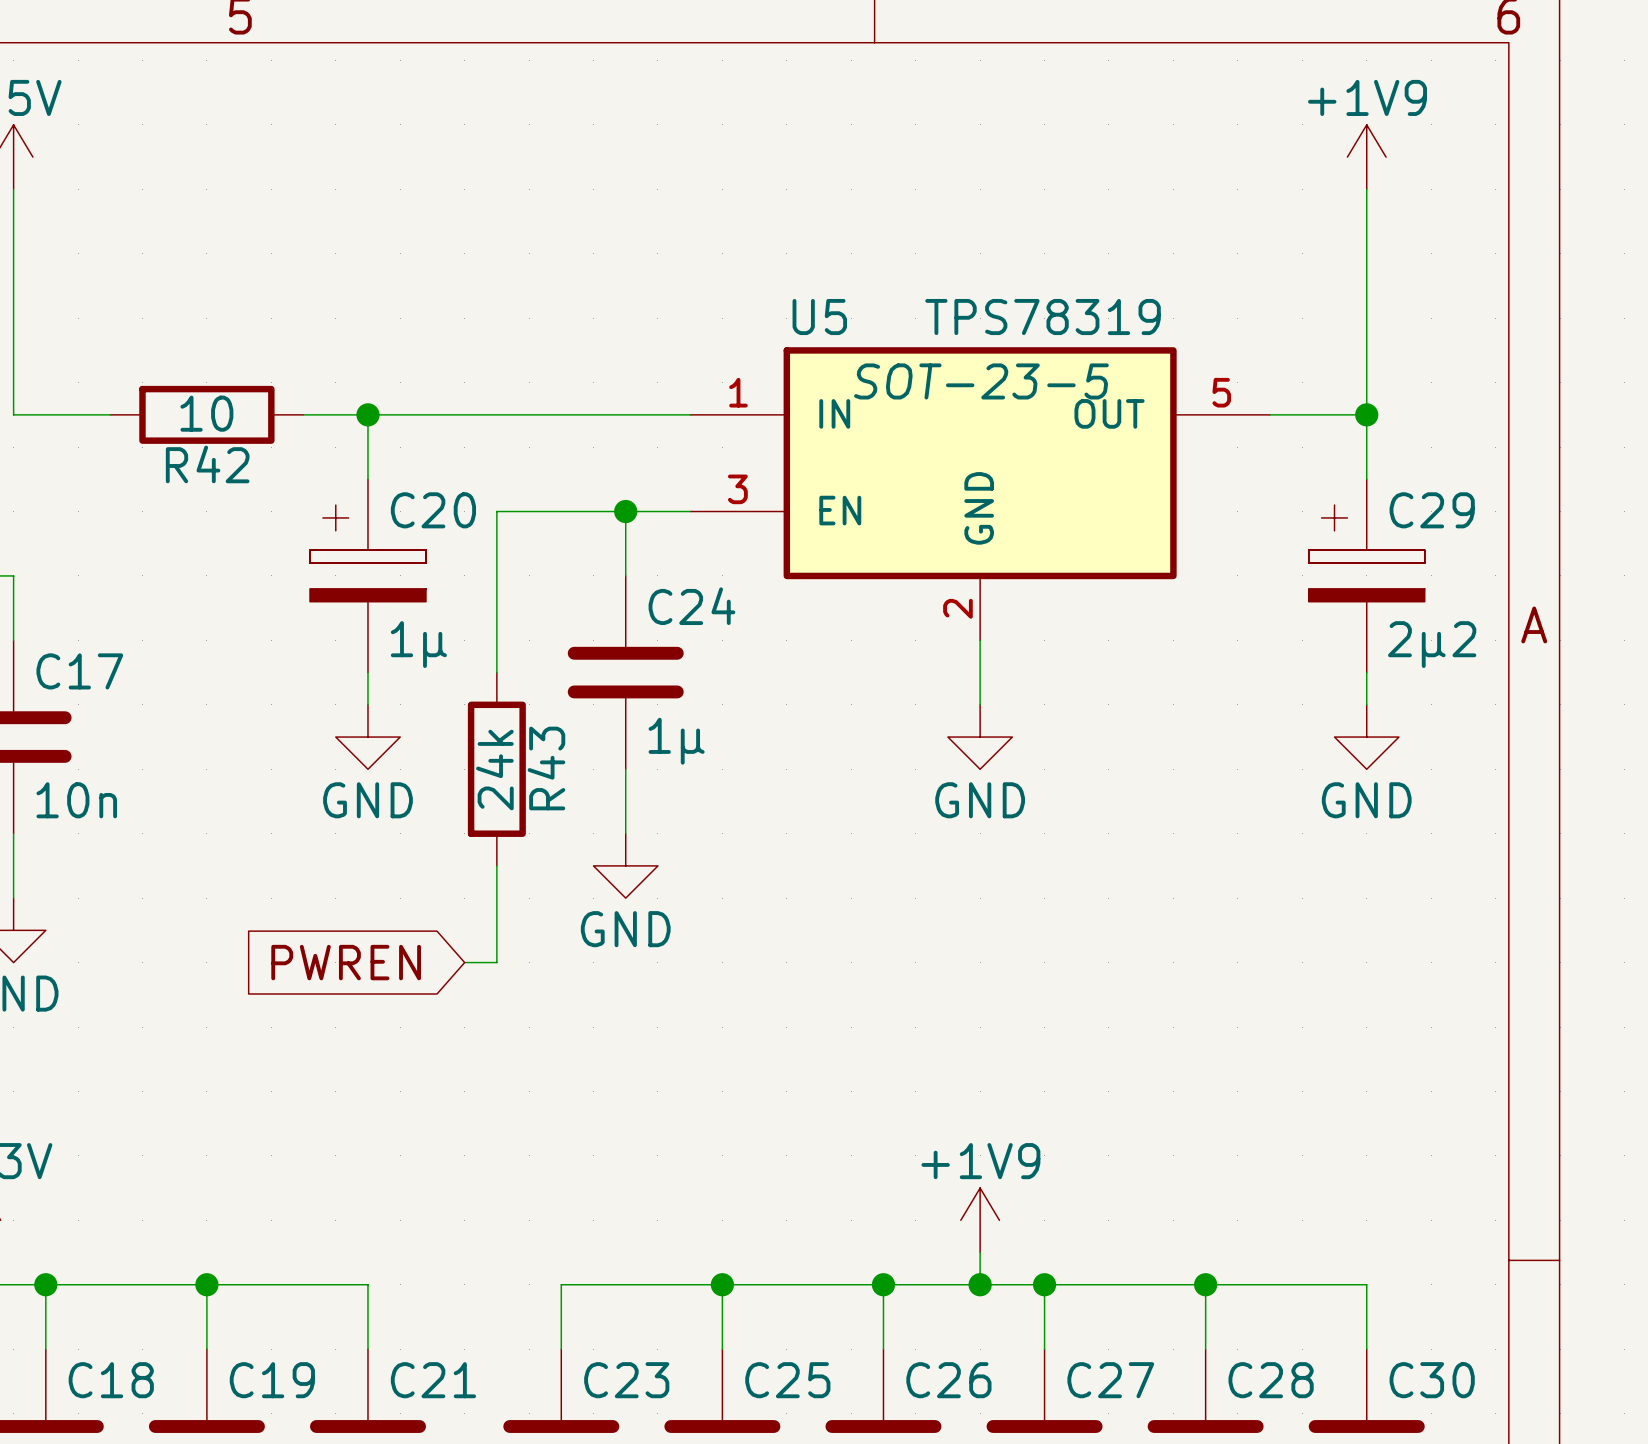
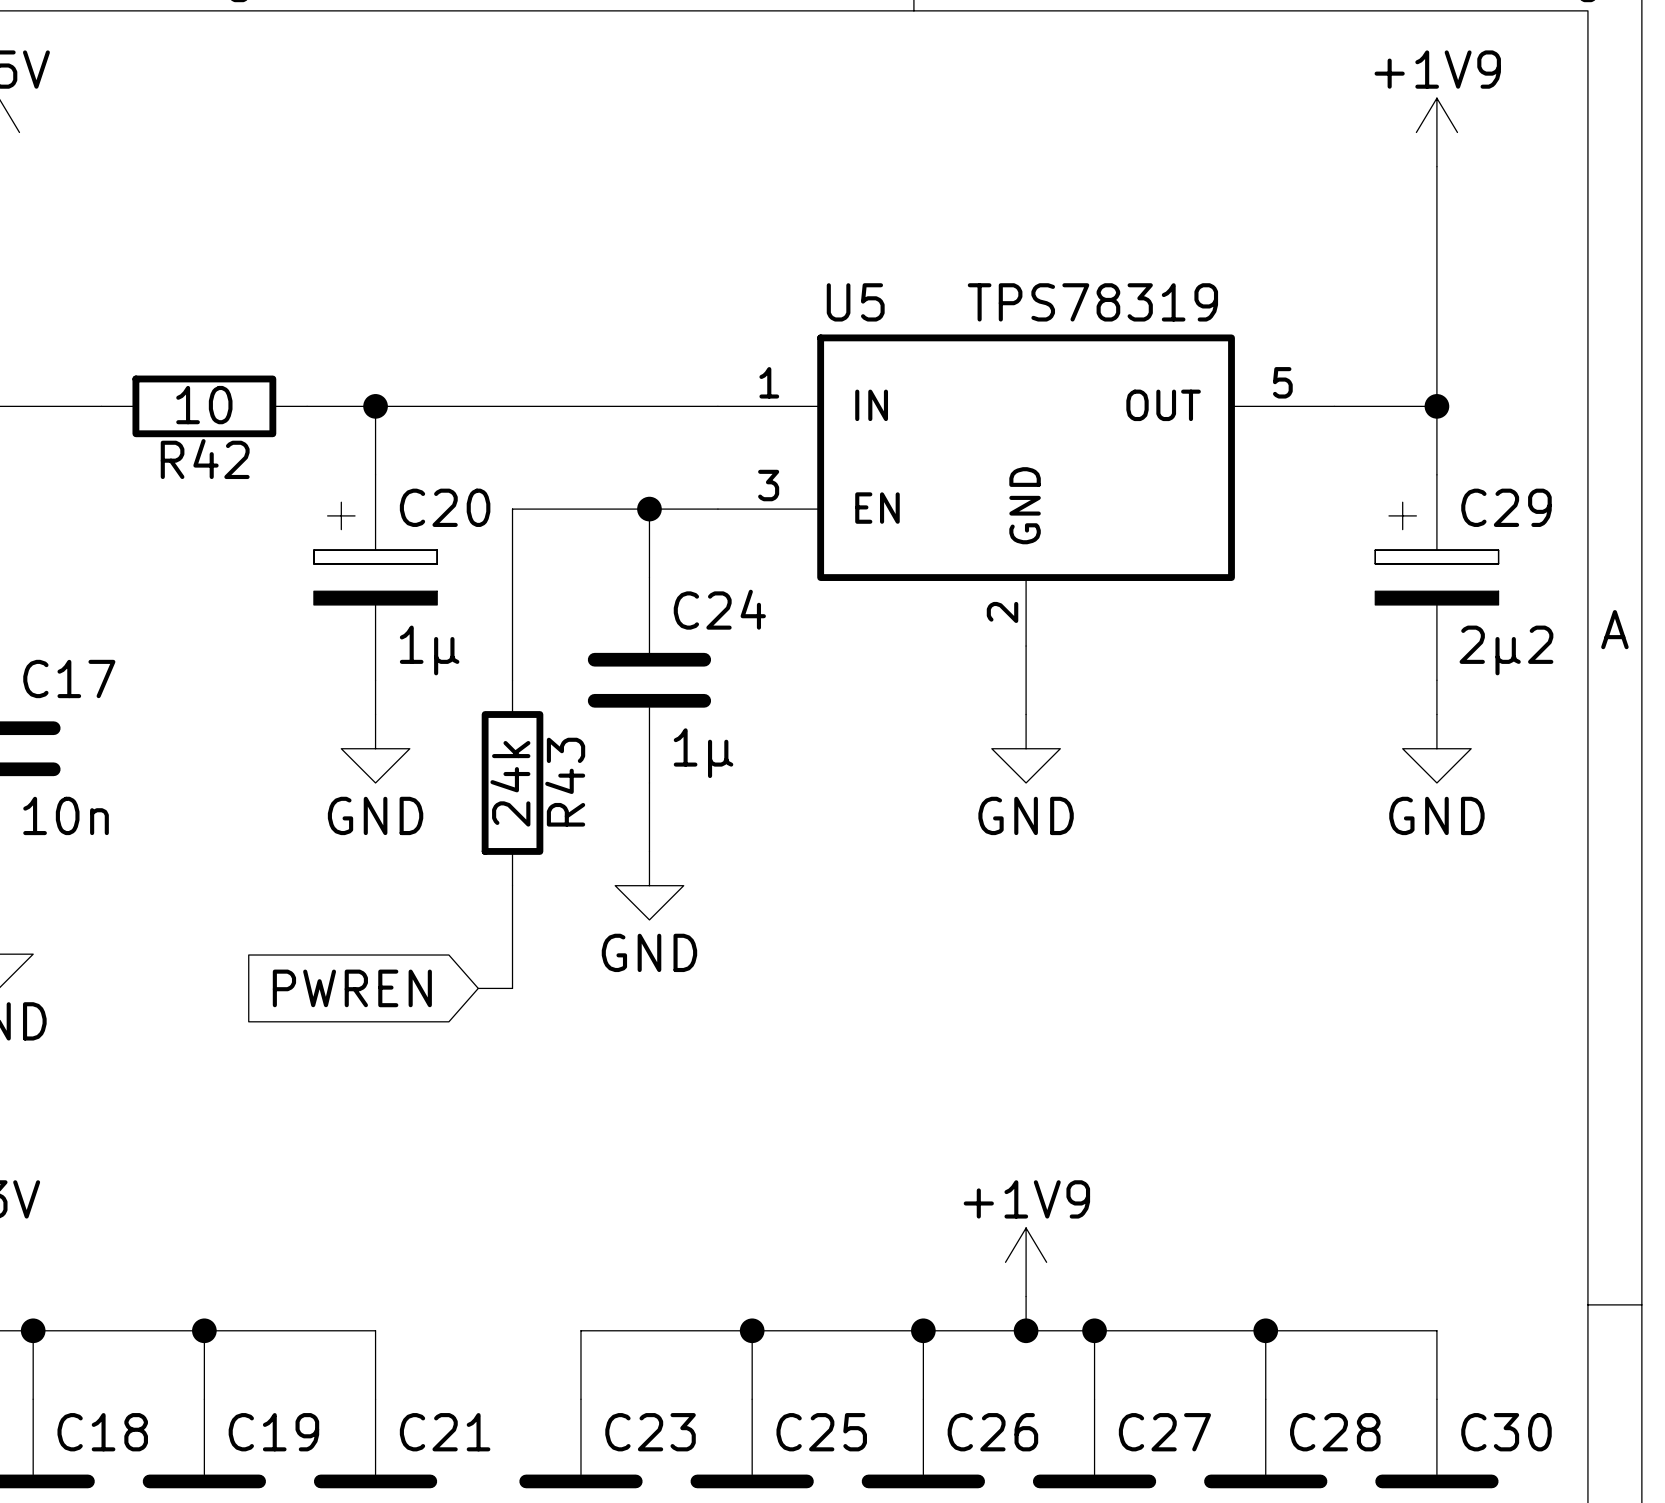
U5 text: SOT-23-5 (981, 381) -> none

